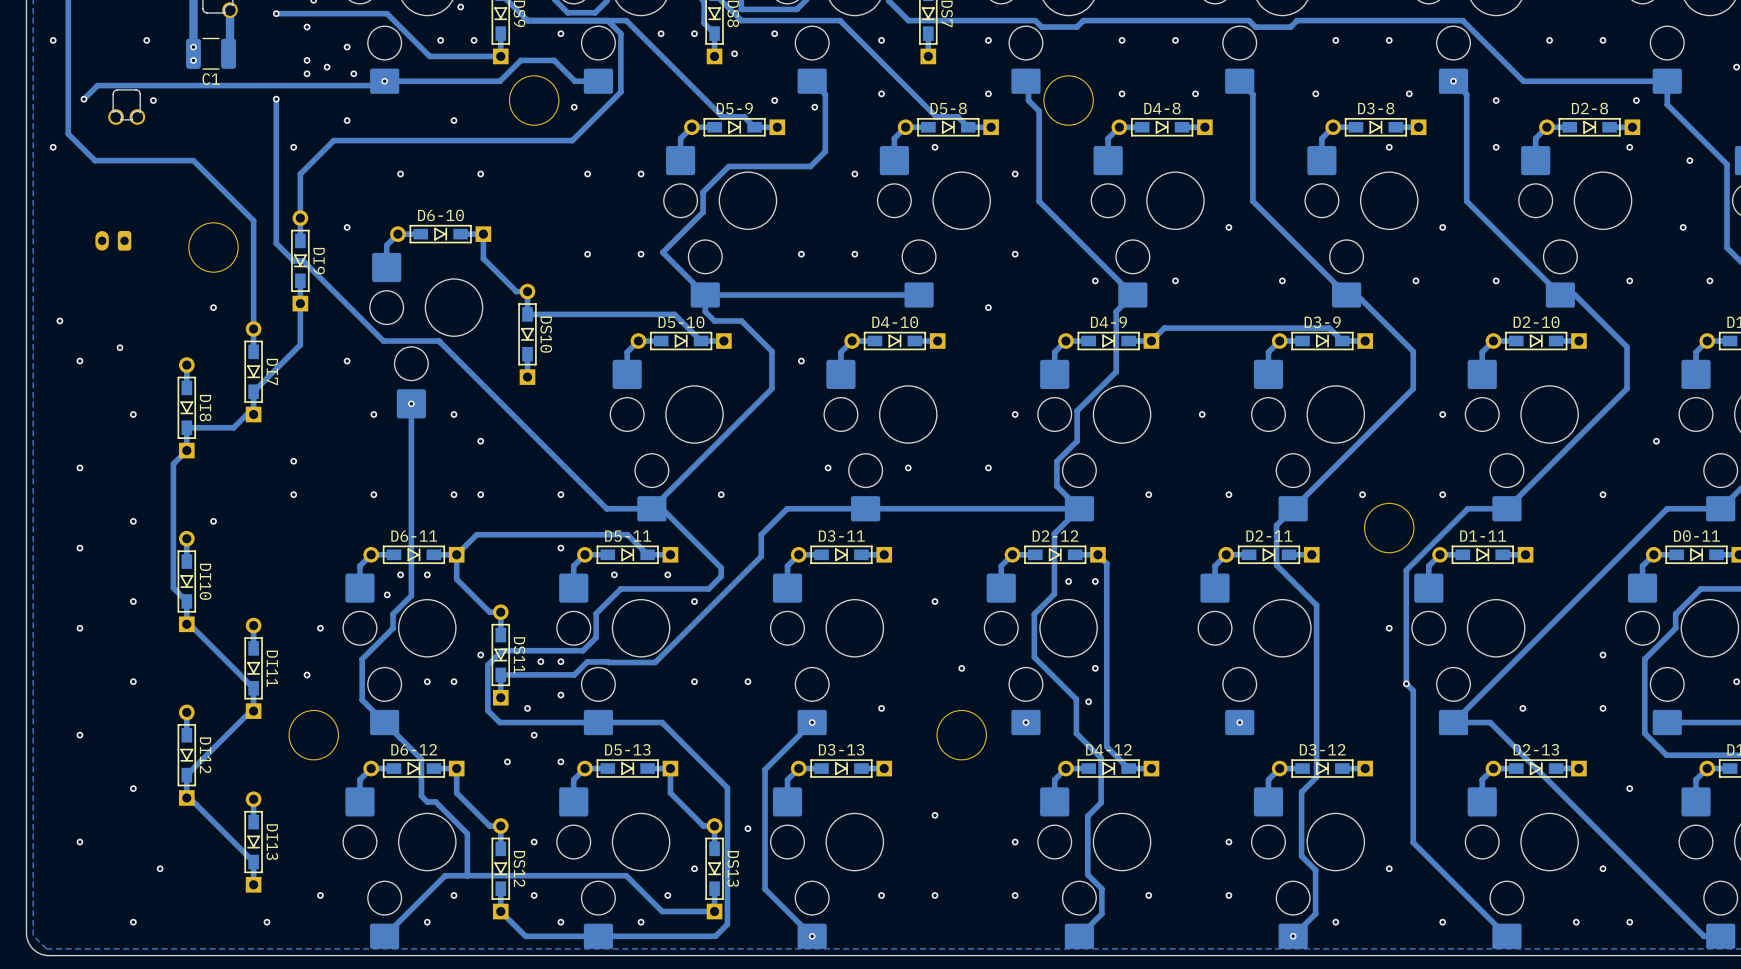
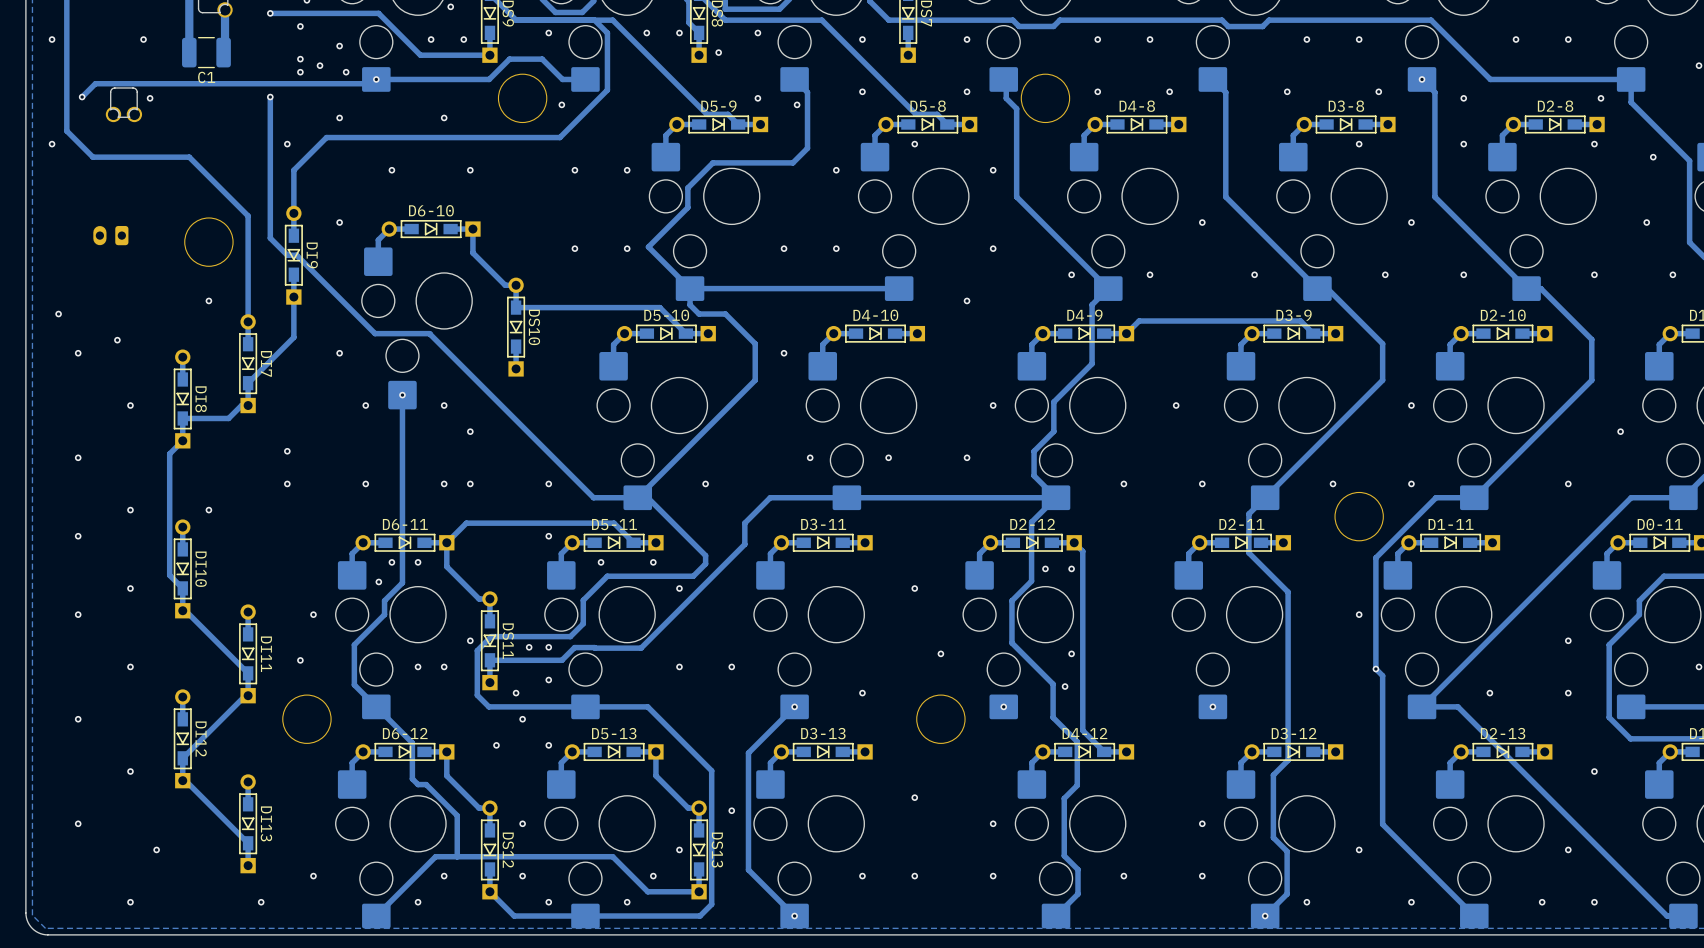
via: (193, 47) -> none
via: (193, 60) -> none

